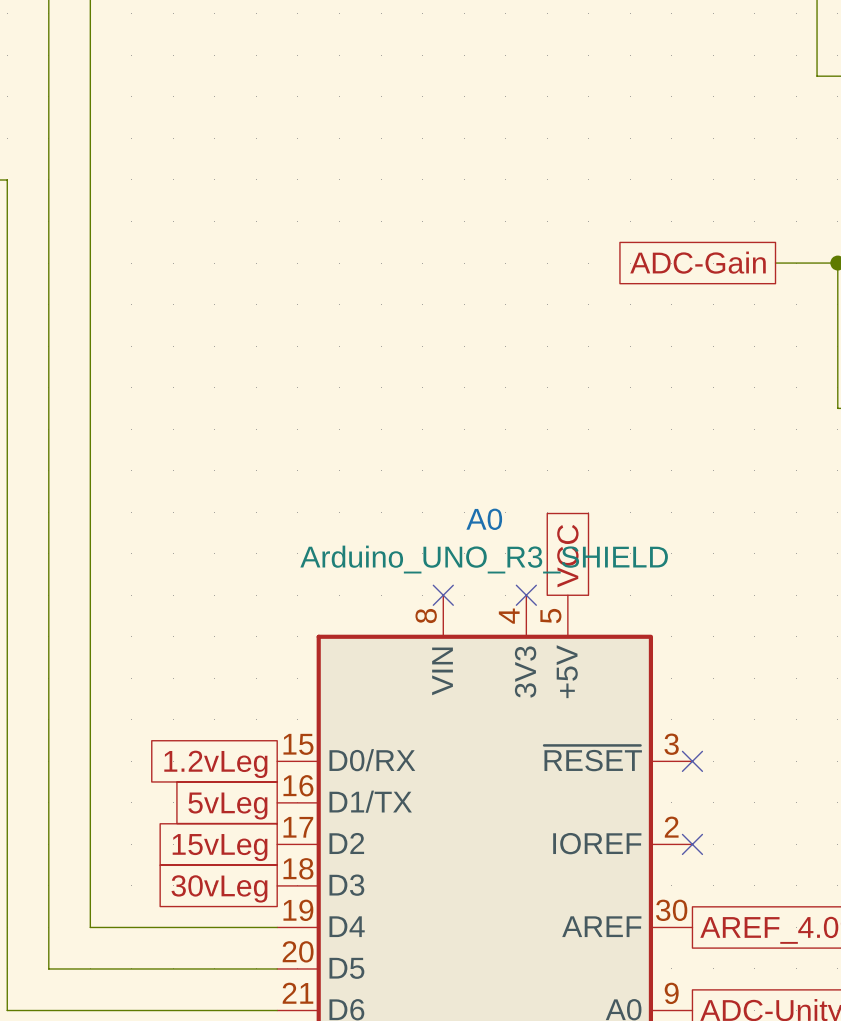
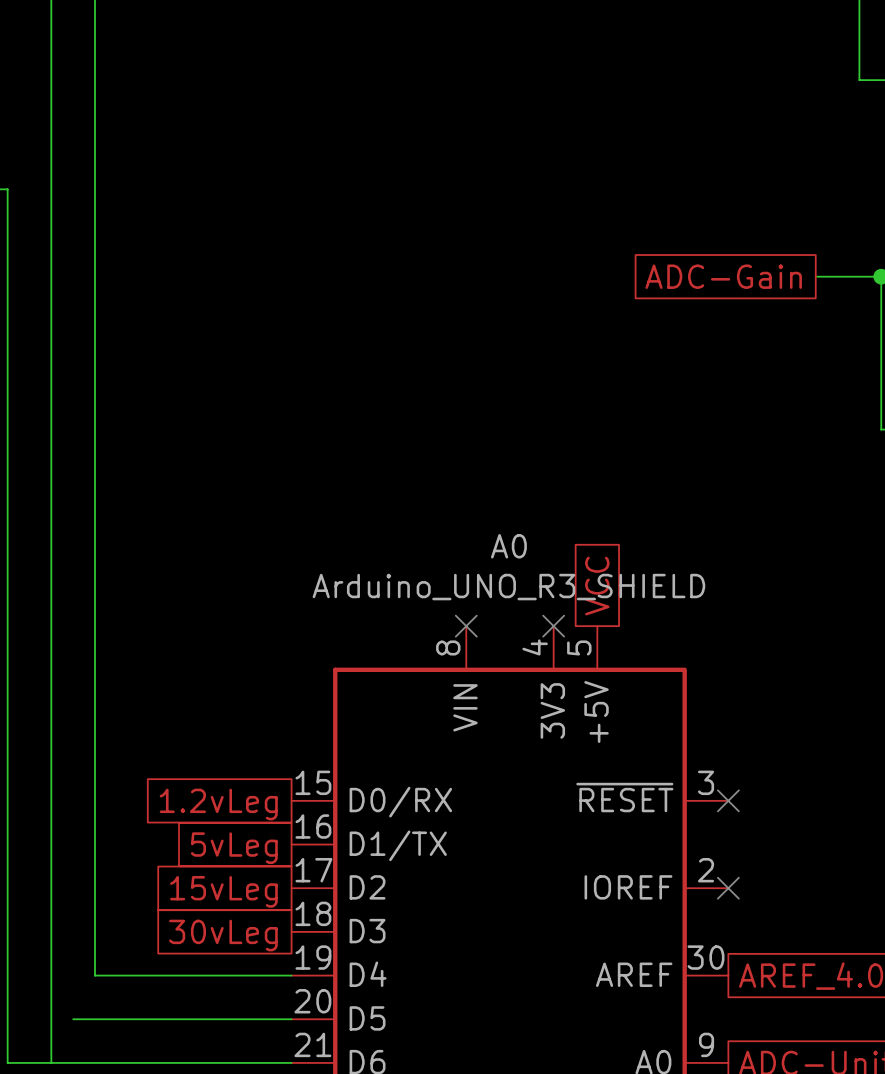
wire: (48, 968) (69, 968) -> (51, 1019) (51, 1062)

